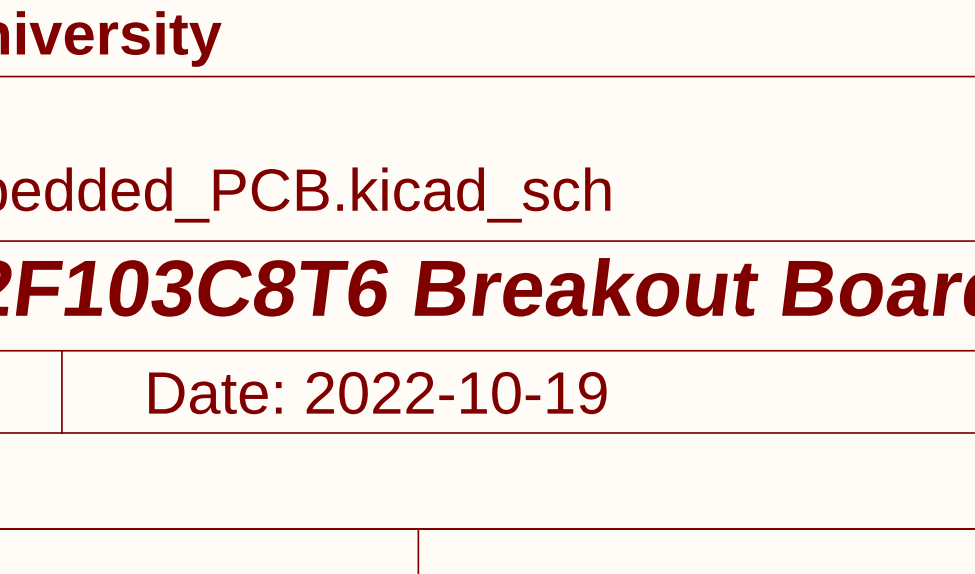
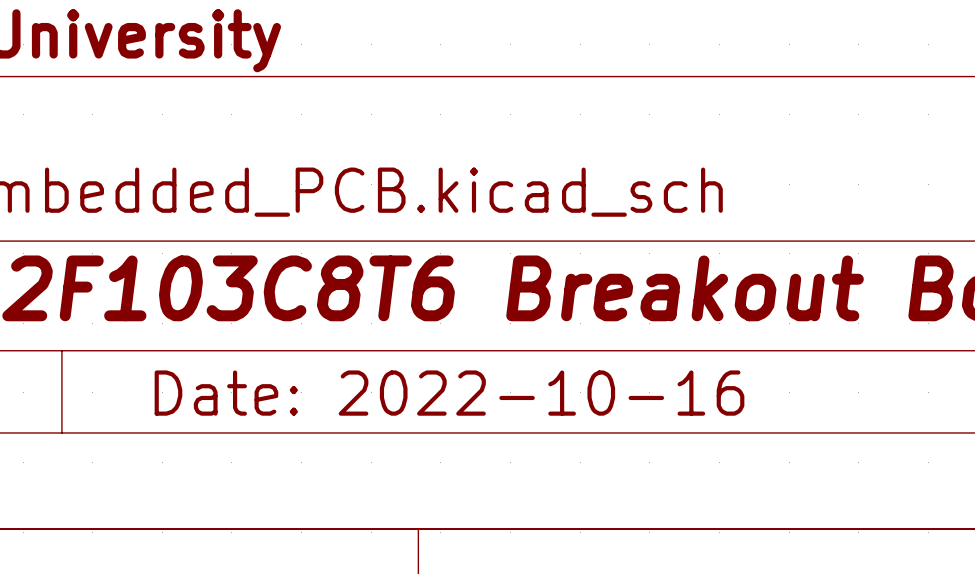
title block: Date: 2022-10-19 (377, 393) -> Date: 2022-10-16 (449, 393)

